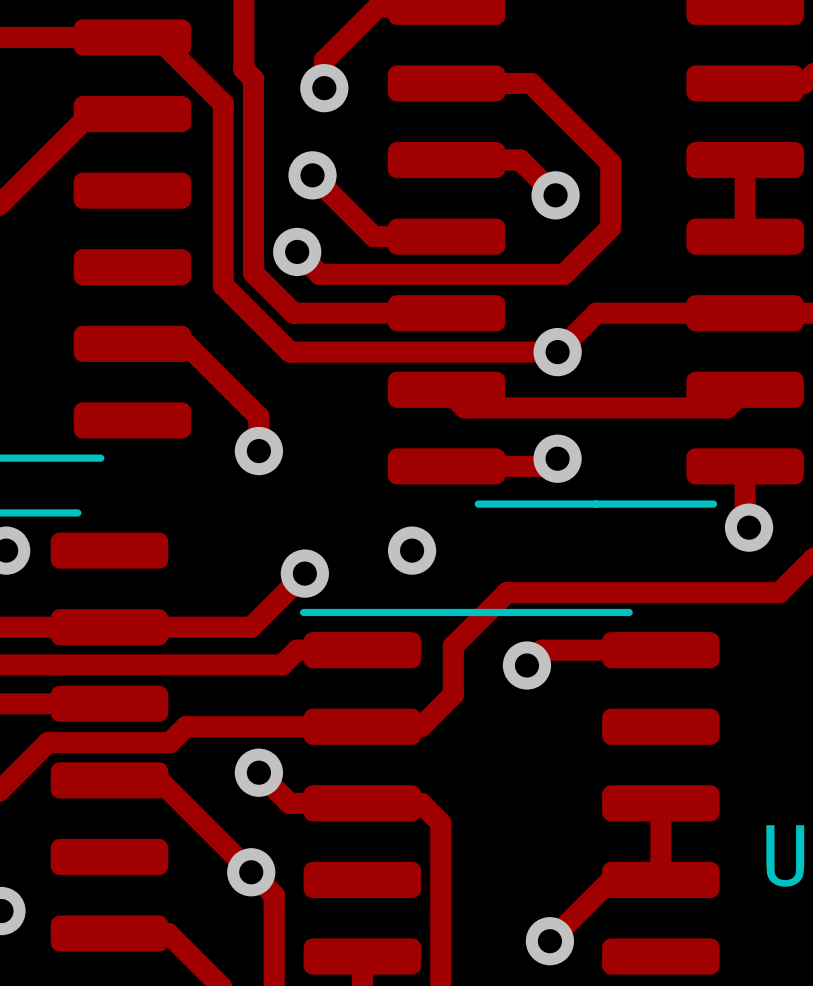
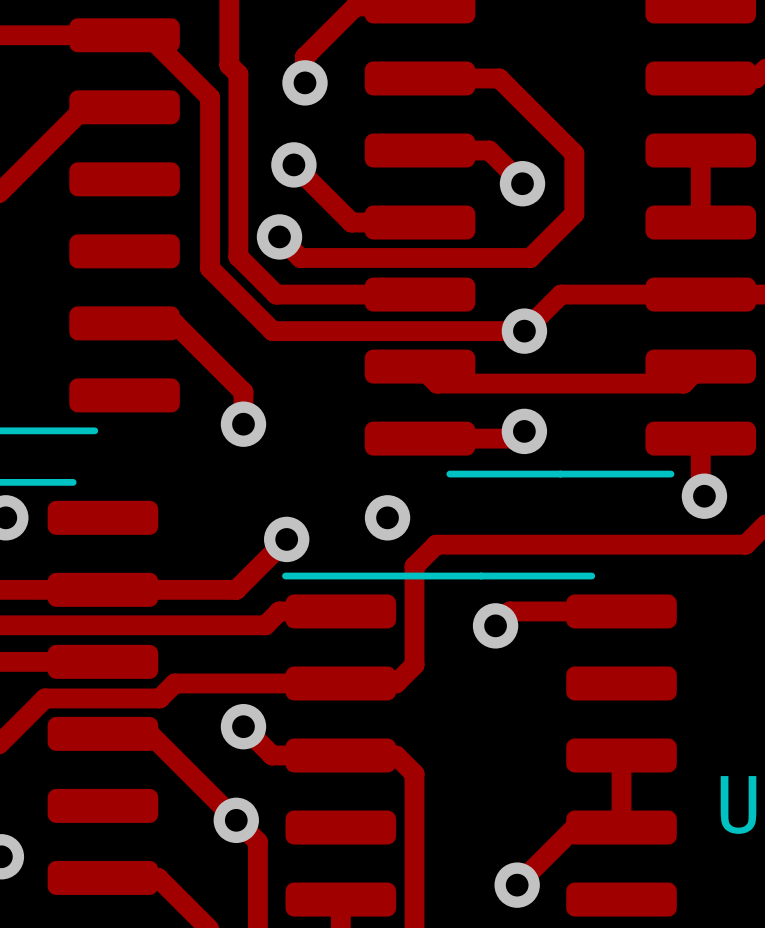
track: (792, 579) (779, 592) (506, 592) (453, 646) (453, 694) (440, 707) -> (745, 544) (436, 544) (414, 566) (414, 665)

